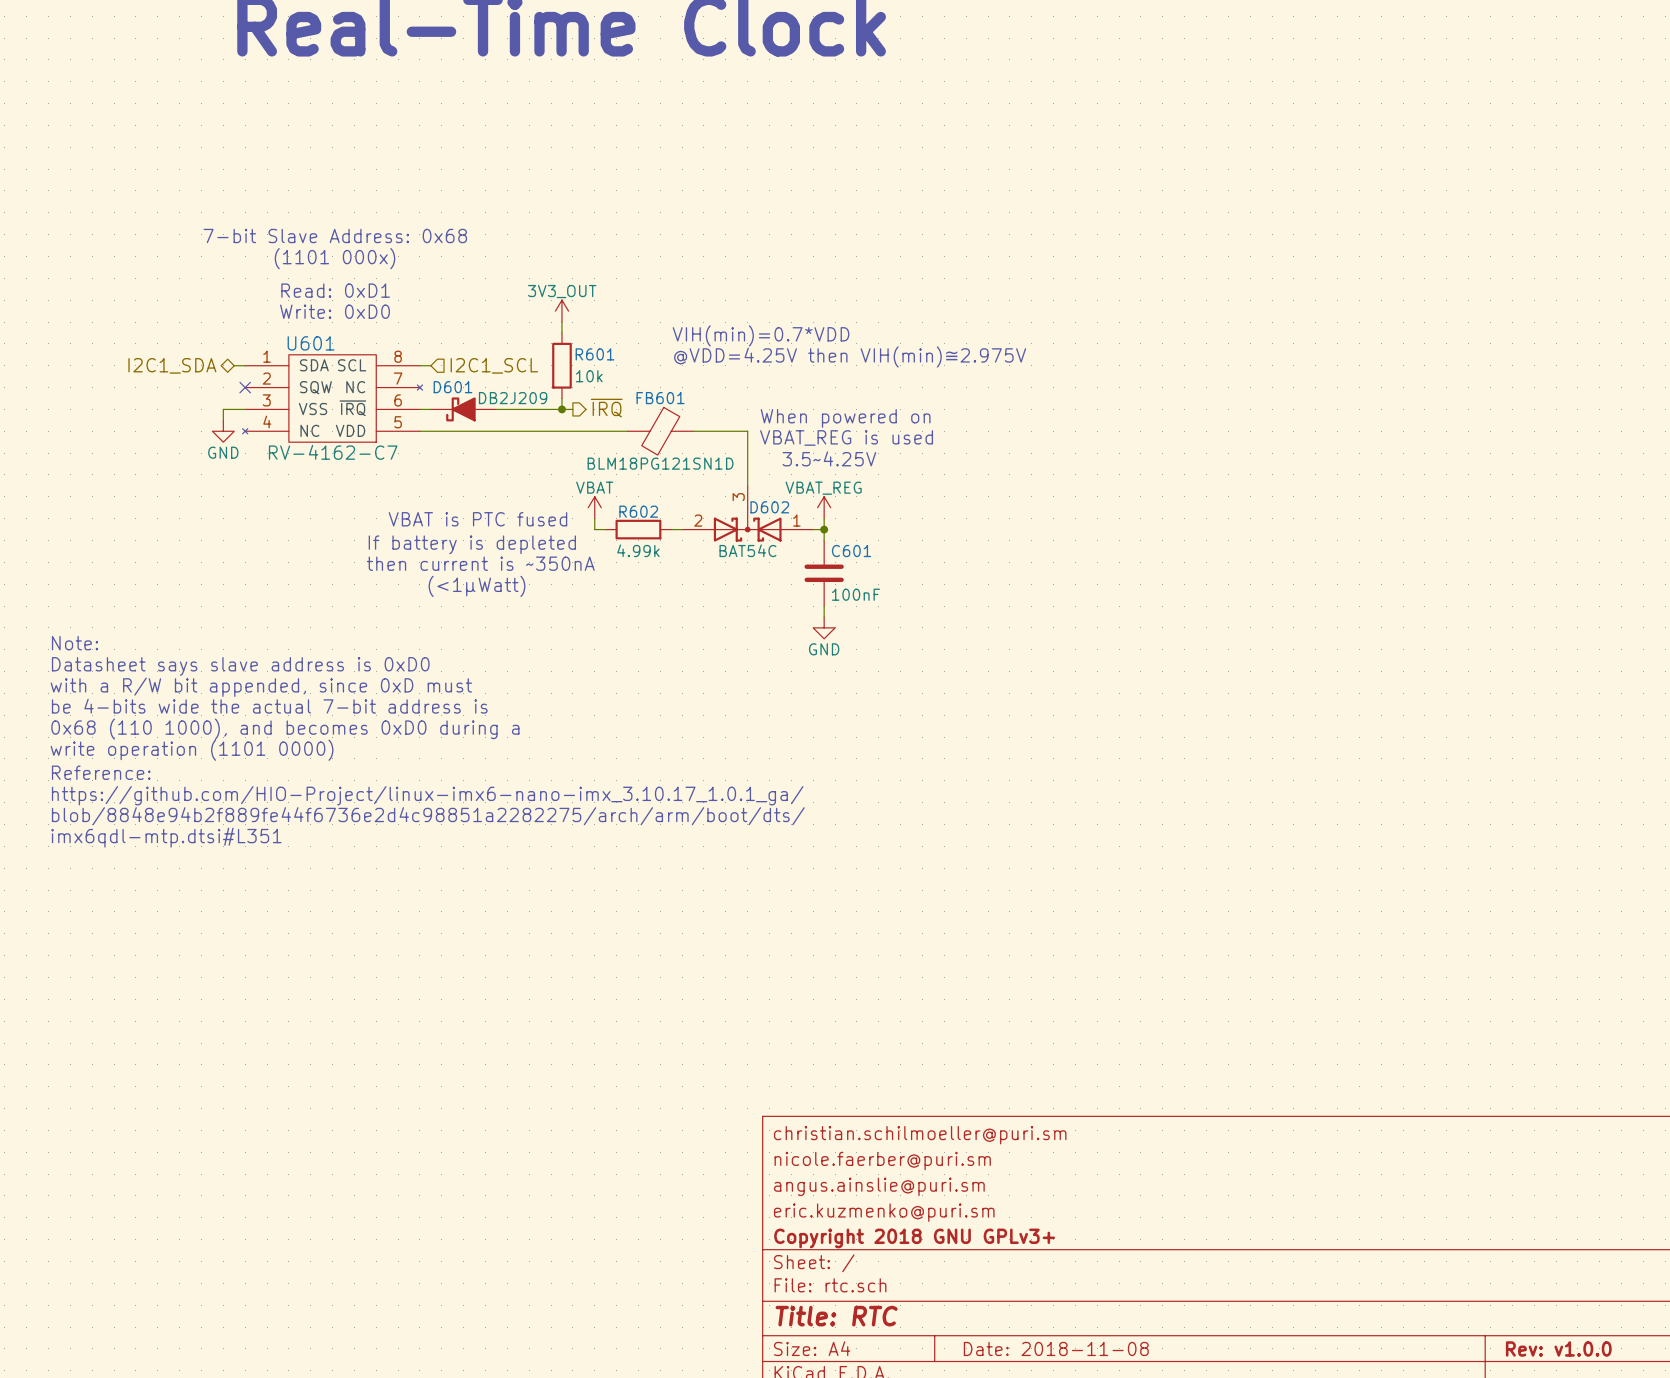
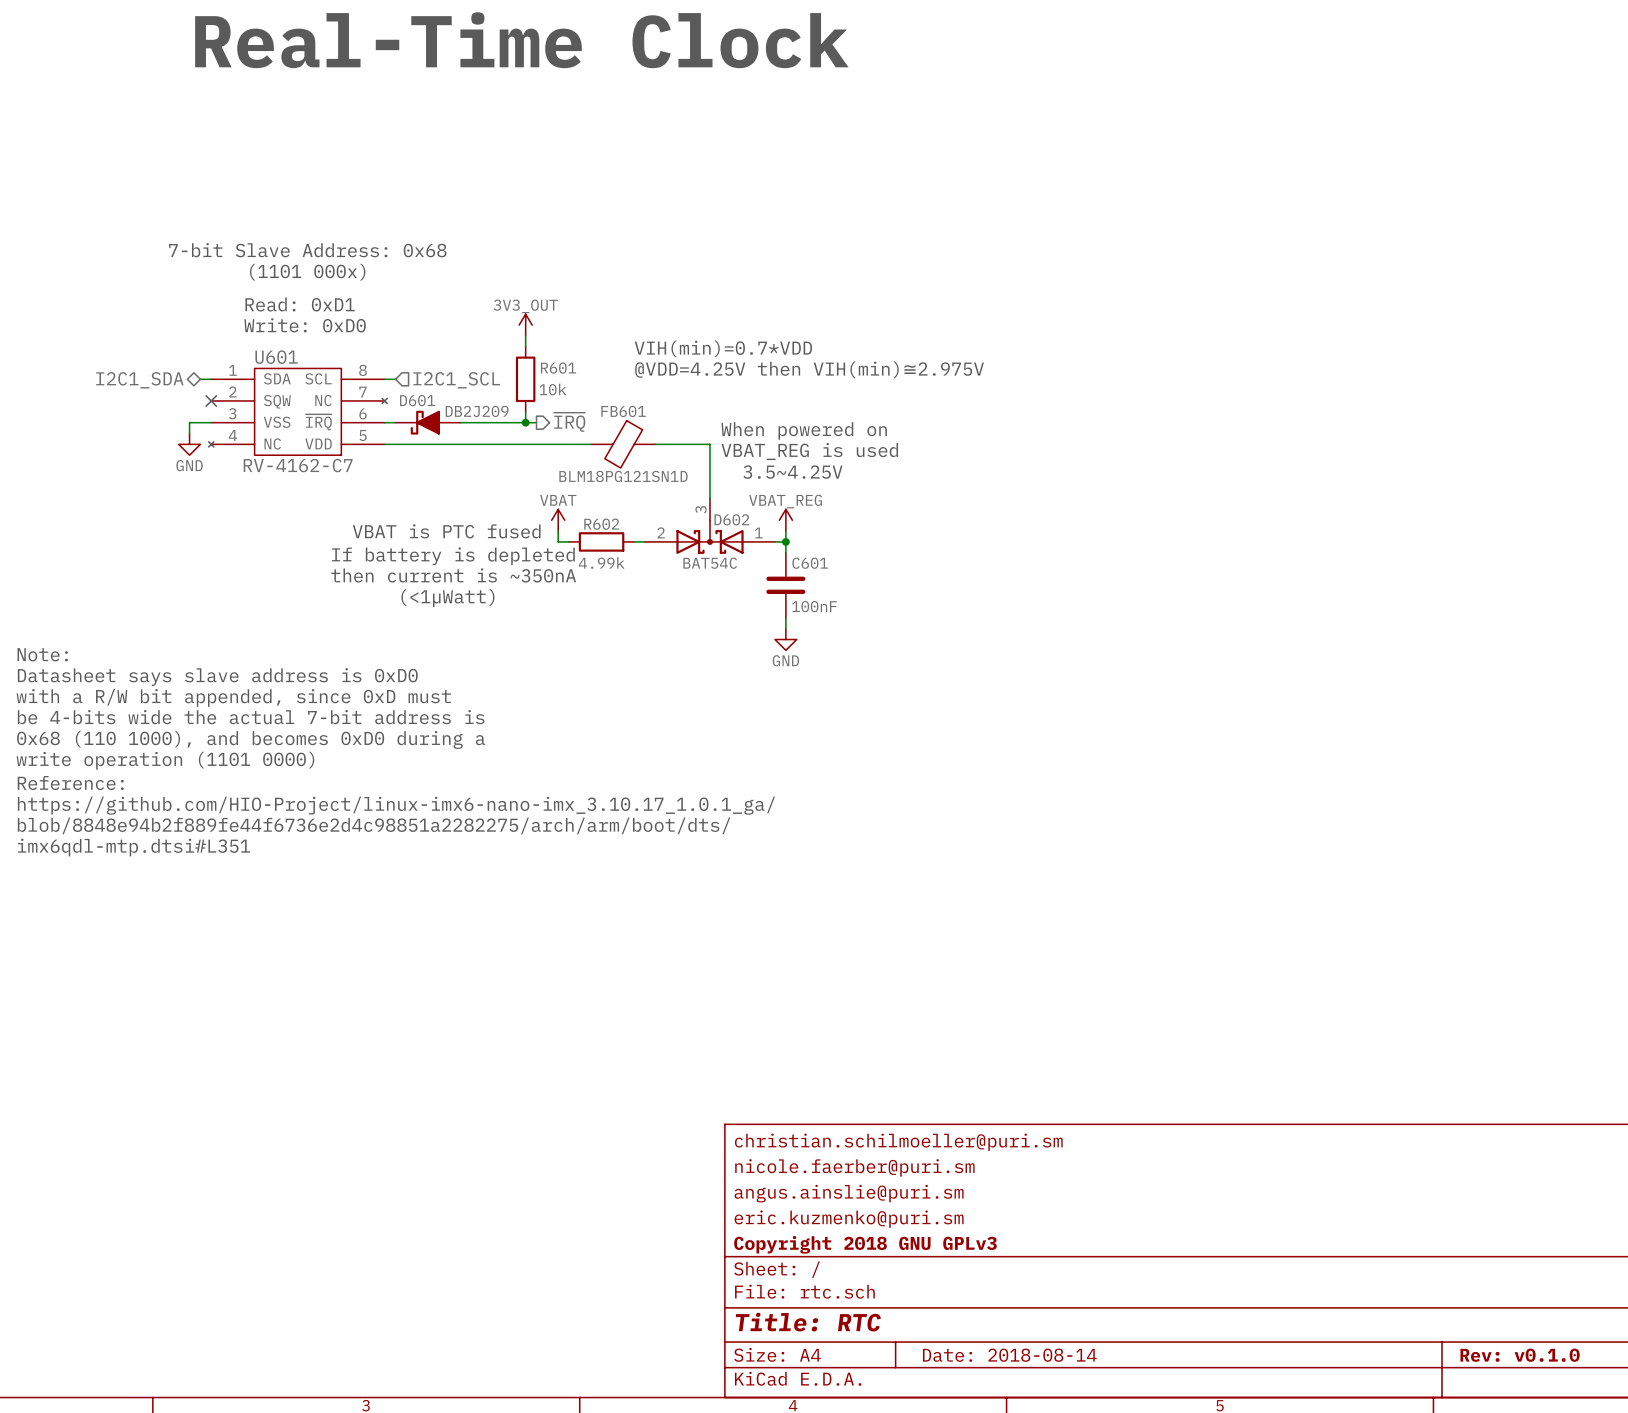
title block: Copyright 2018 GNU GPLv3+ (914, 1238) -> Copyright 2018 GNU GPLv3 (865, 1244)
title block: Date: 2018-11-08 (1056, 1348) -> Date: 2018-08-14 (1009, 1355)
title block: Rev: v1.0.0 (1558, 1348) -> Rev: v0.1.0 (1520, 1355)

